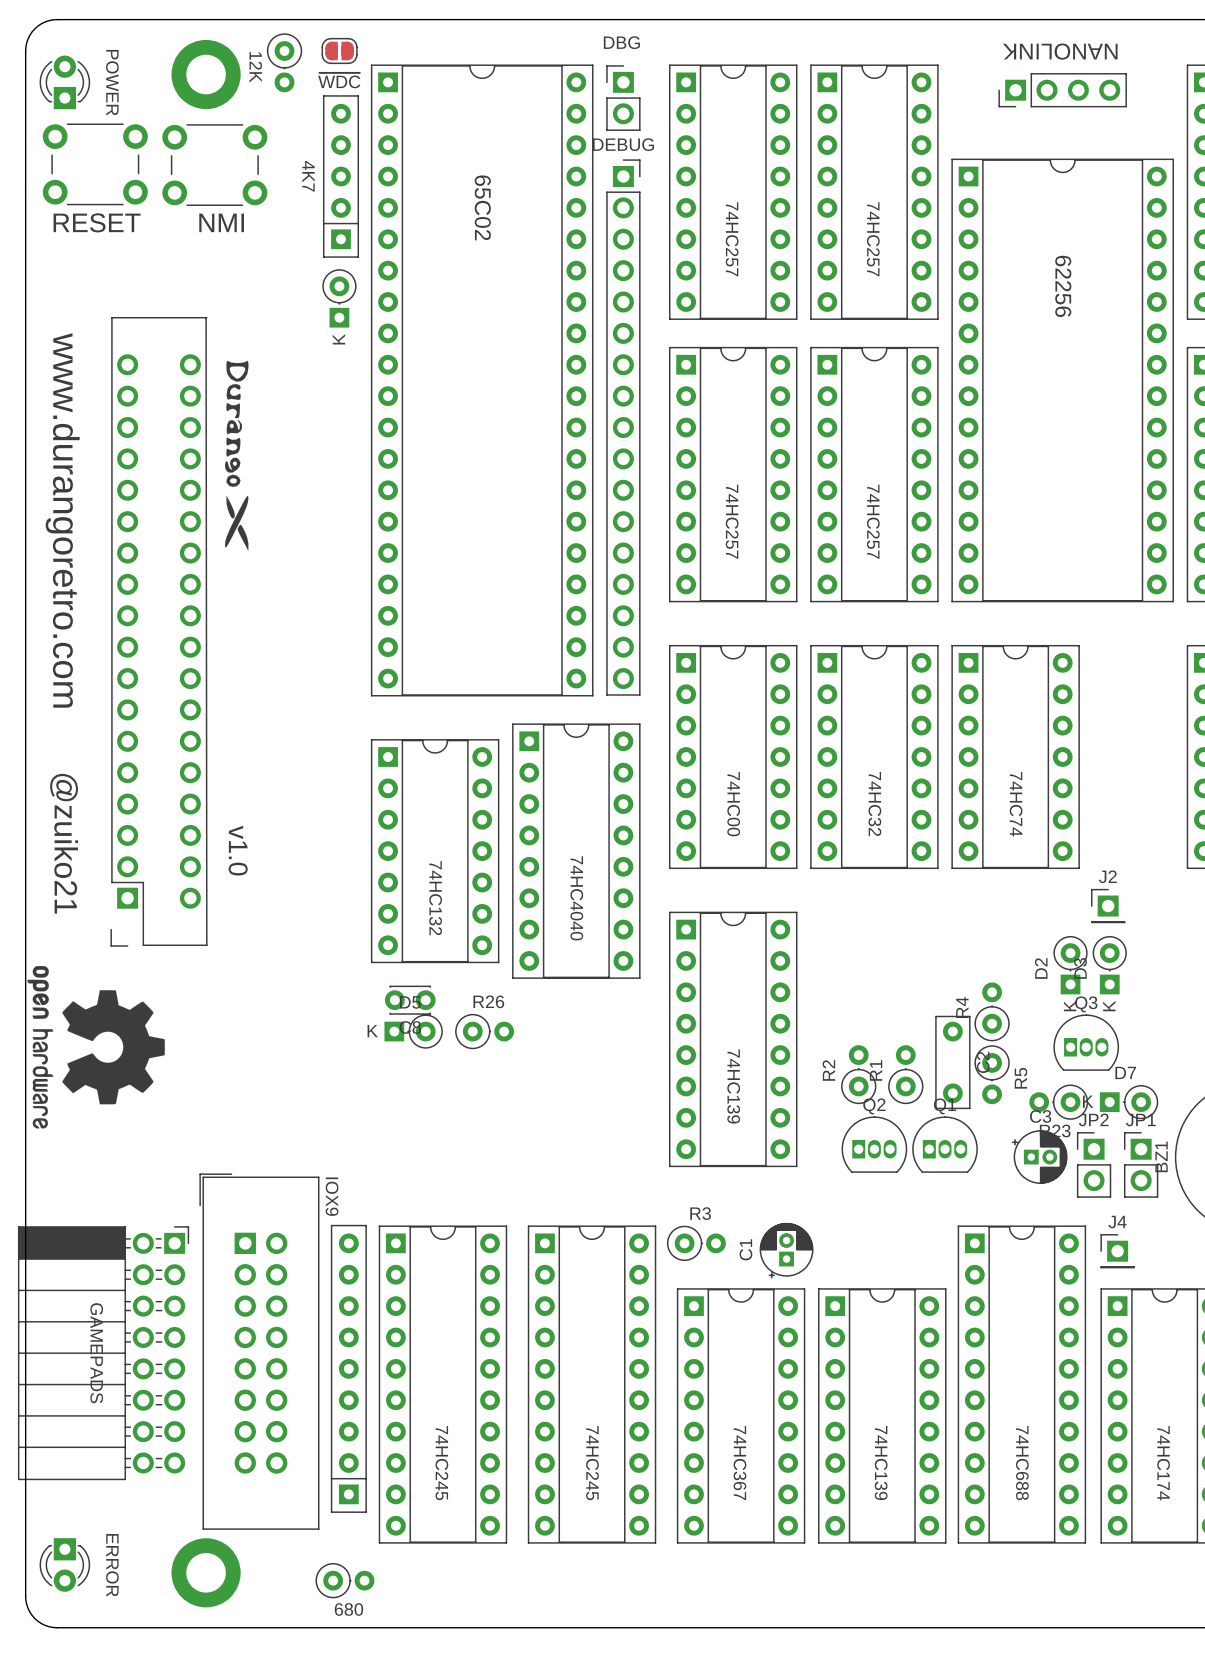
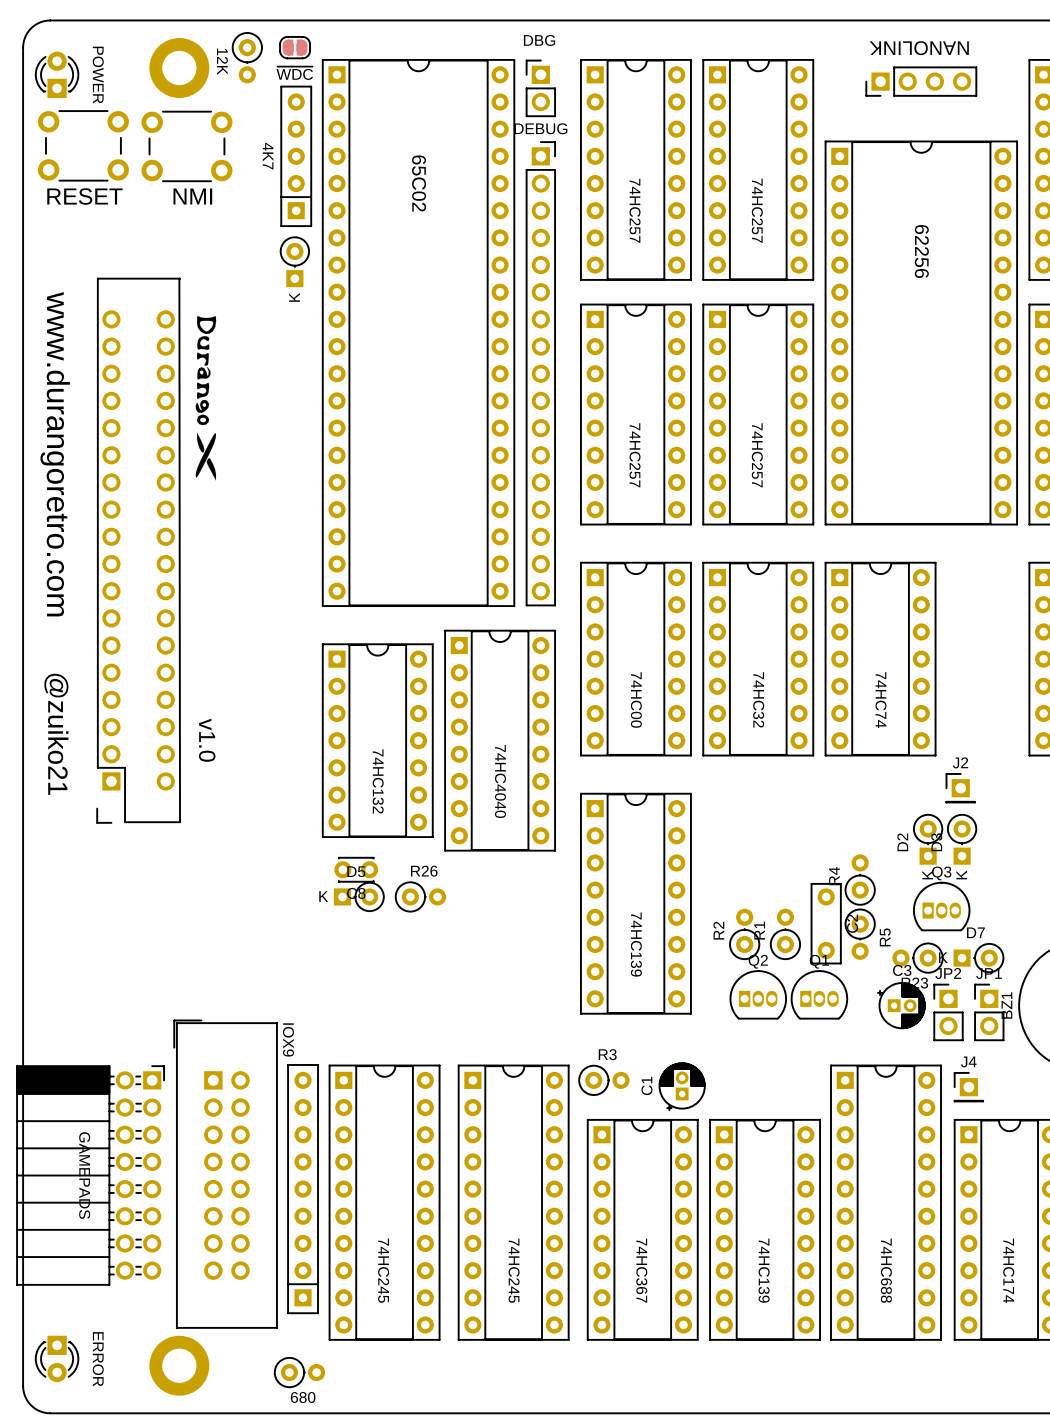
drawing: [27, 966, 165, 1129] -> none

